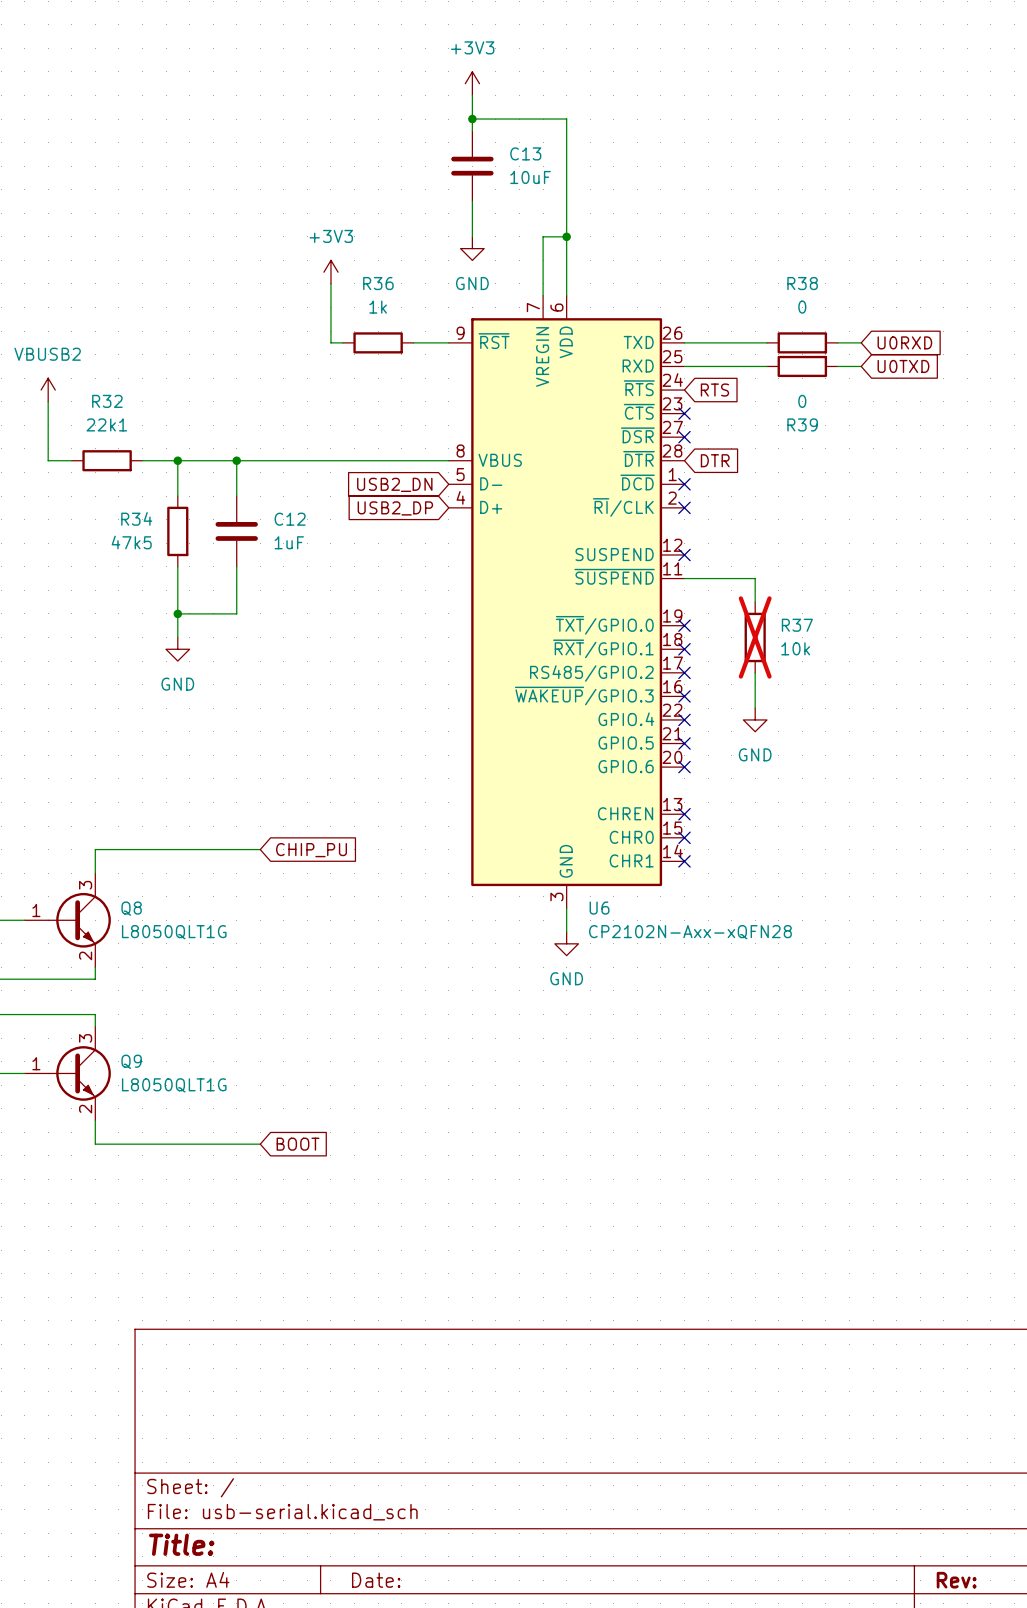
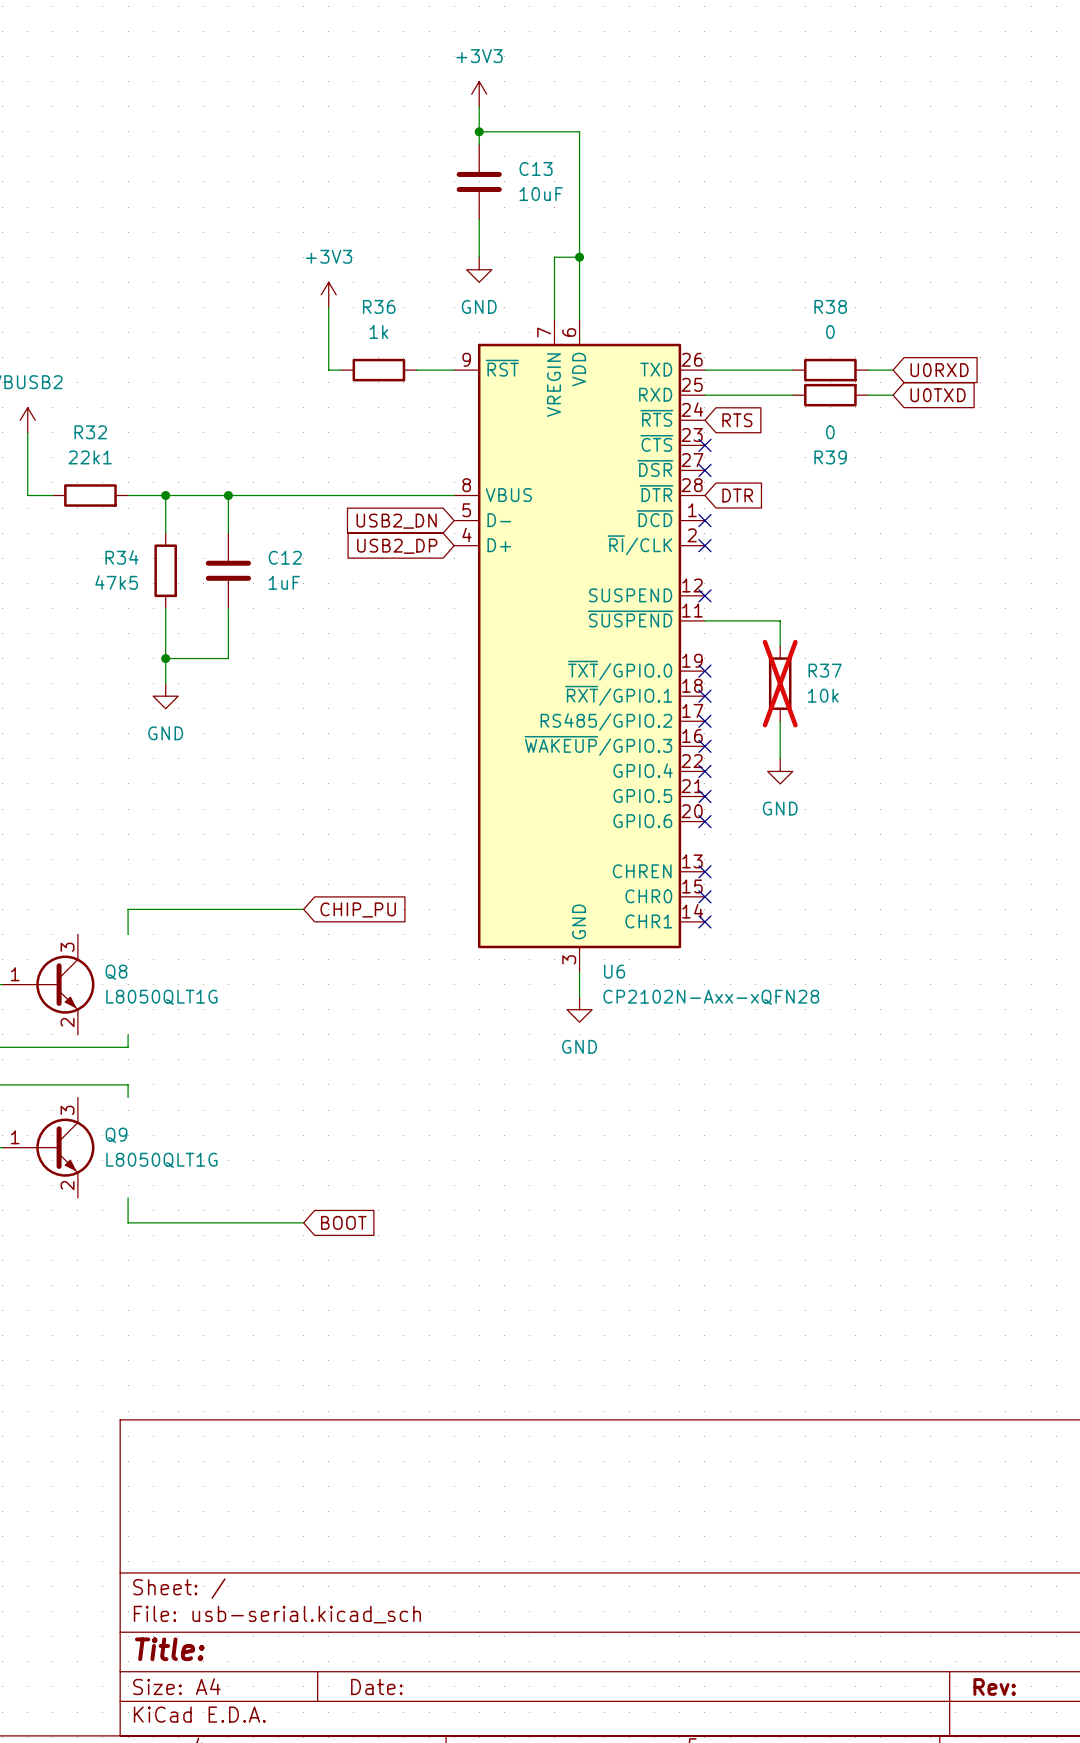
wire: (142, 849) (95, 849) (95, 873) -> (128, 909) (128, 934)
wire: none -> (253, 909) (303, 909)
global label position: CHIP_PU (311, 850) -> CHIP_PU (358, 909)
wire: (95, 967) (95, 979) -> (128, 1034) (128, 1047) (77, 1047)
wire: (95, 1014) (95, 1026) -> (77, 1084) (128, 1084) (128, 1097)
wire: (95, 1120) (95, 1144) (142, 1144) -> (128, 1197) (128, 1222)
wire: none -> (253, 1222) (303, 1222)
global label position: BOOT (298, 1144) -> BOOT (343, 1222)

